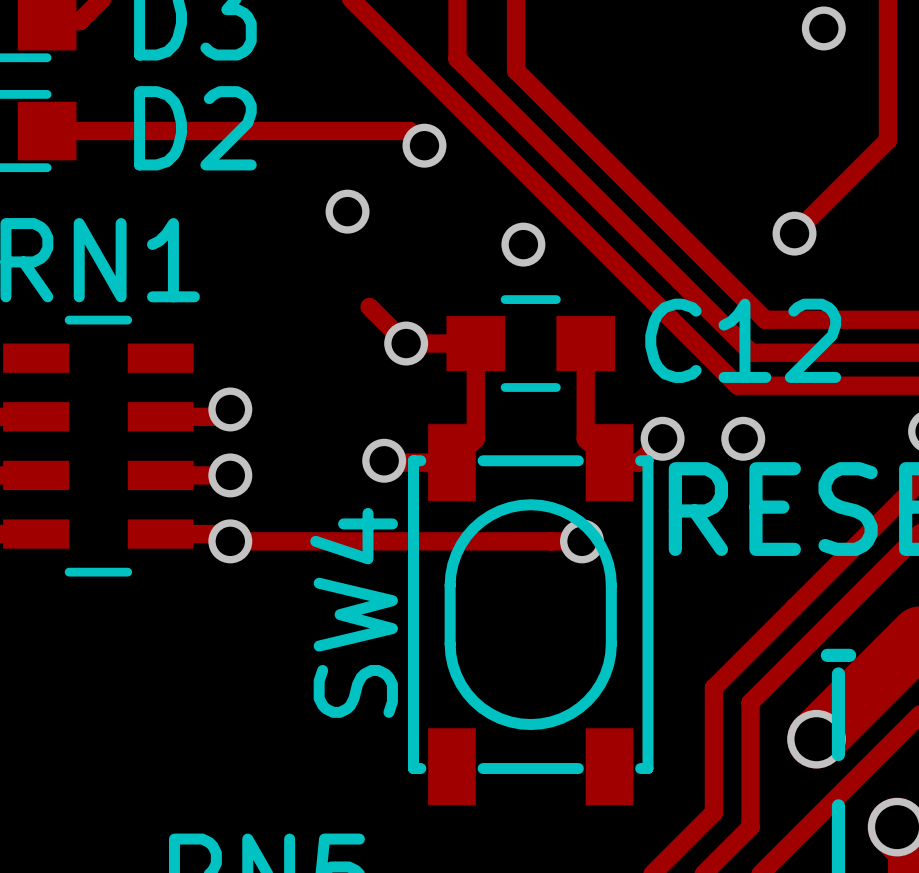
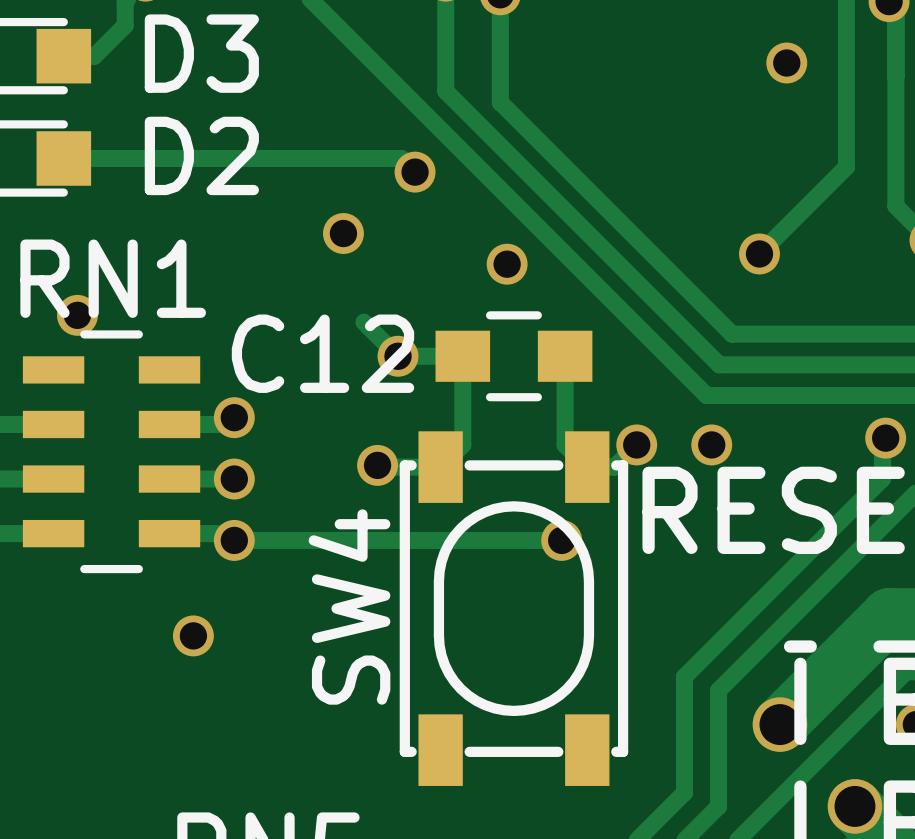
via: none -> (77, 315)
C12 name position: C12 (743, 340) -> C12 (322, 353)
via: none -> (193, 635)

